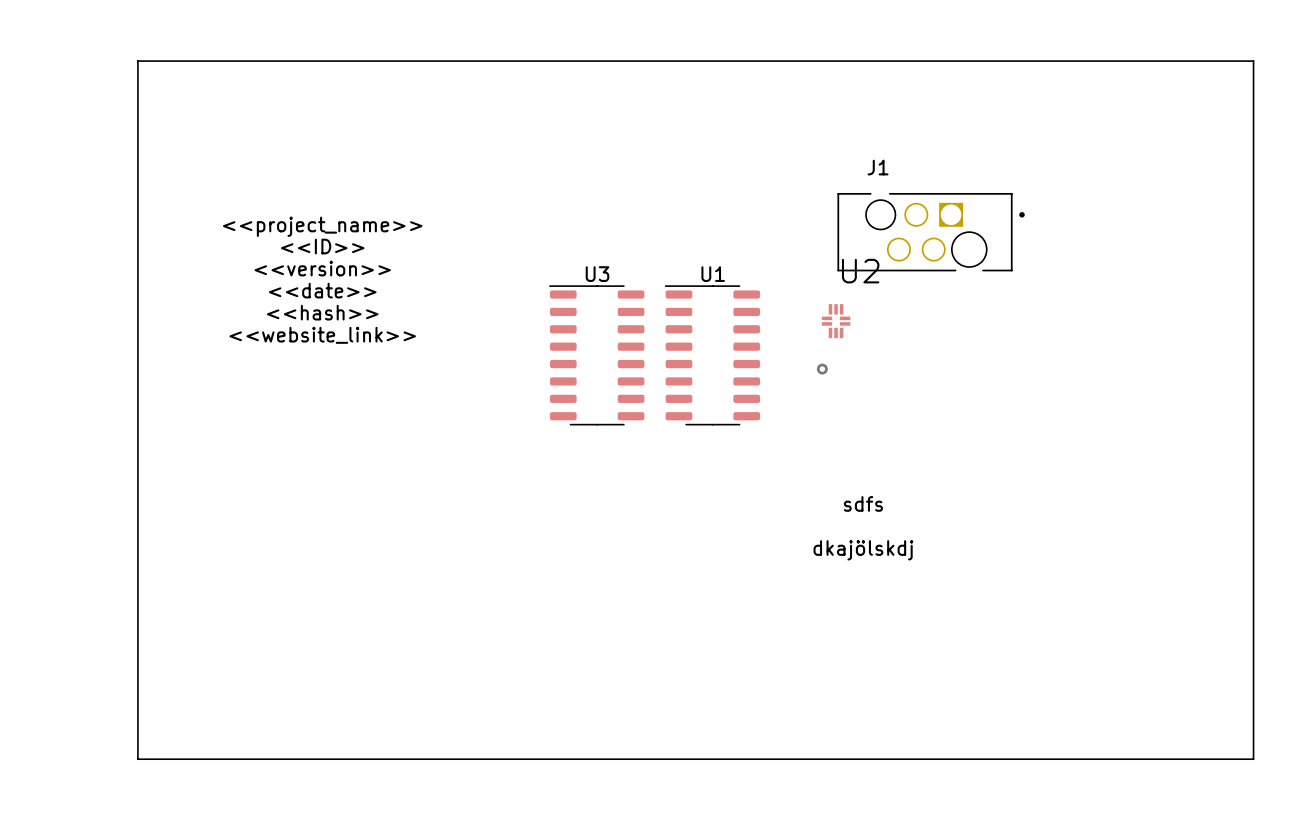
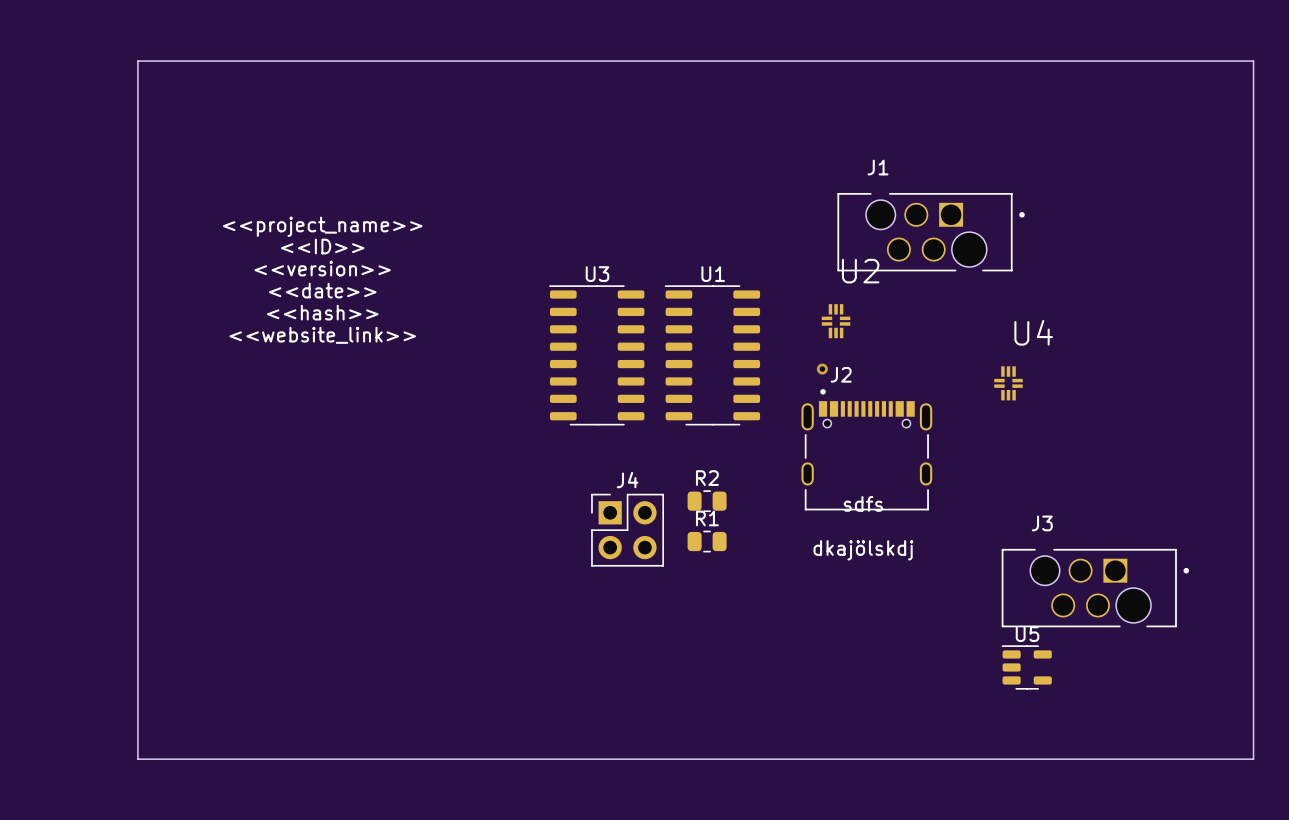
U4: none -> (1008, 383)
J2: none -> (866, 449)
R2: none -> (707, 501)
J4: none -> (627, 530)
R1: none -> (707, 541)
J3: none -> (1095, 588)
U5: none -> (1026, 667)

